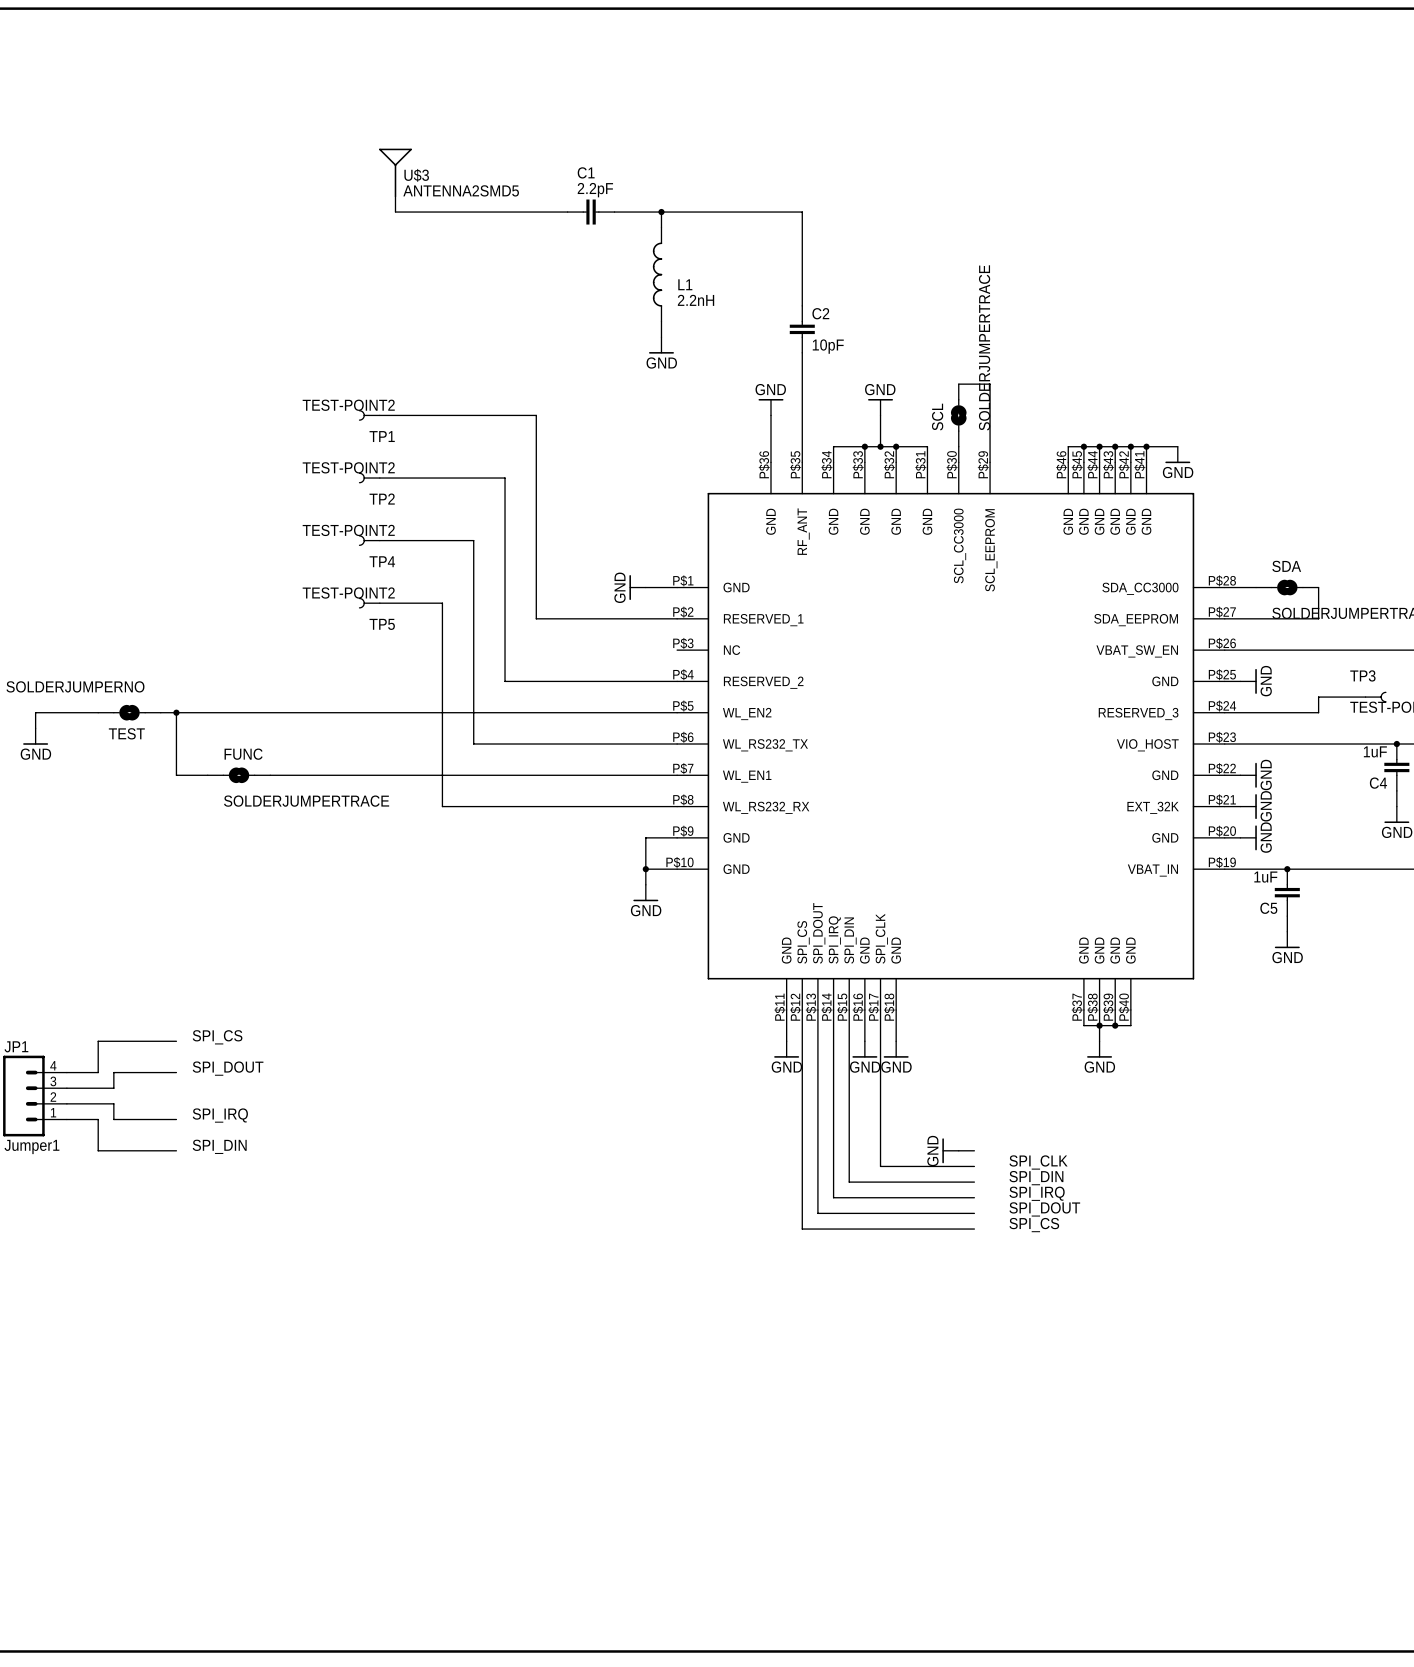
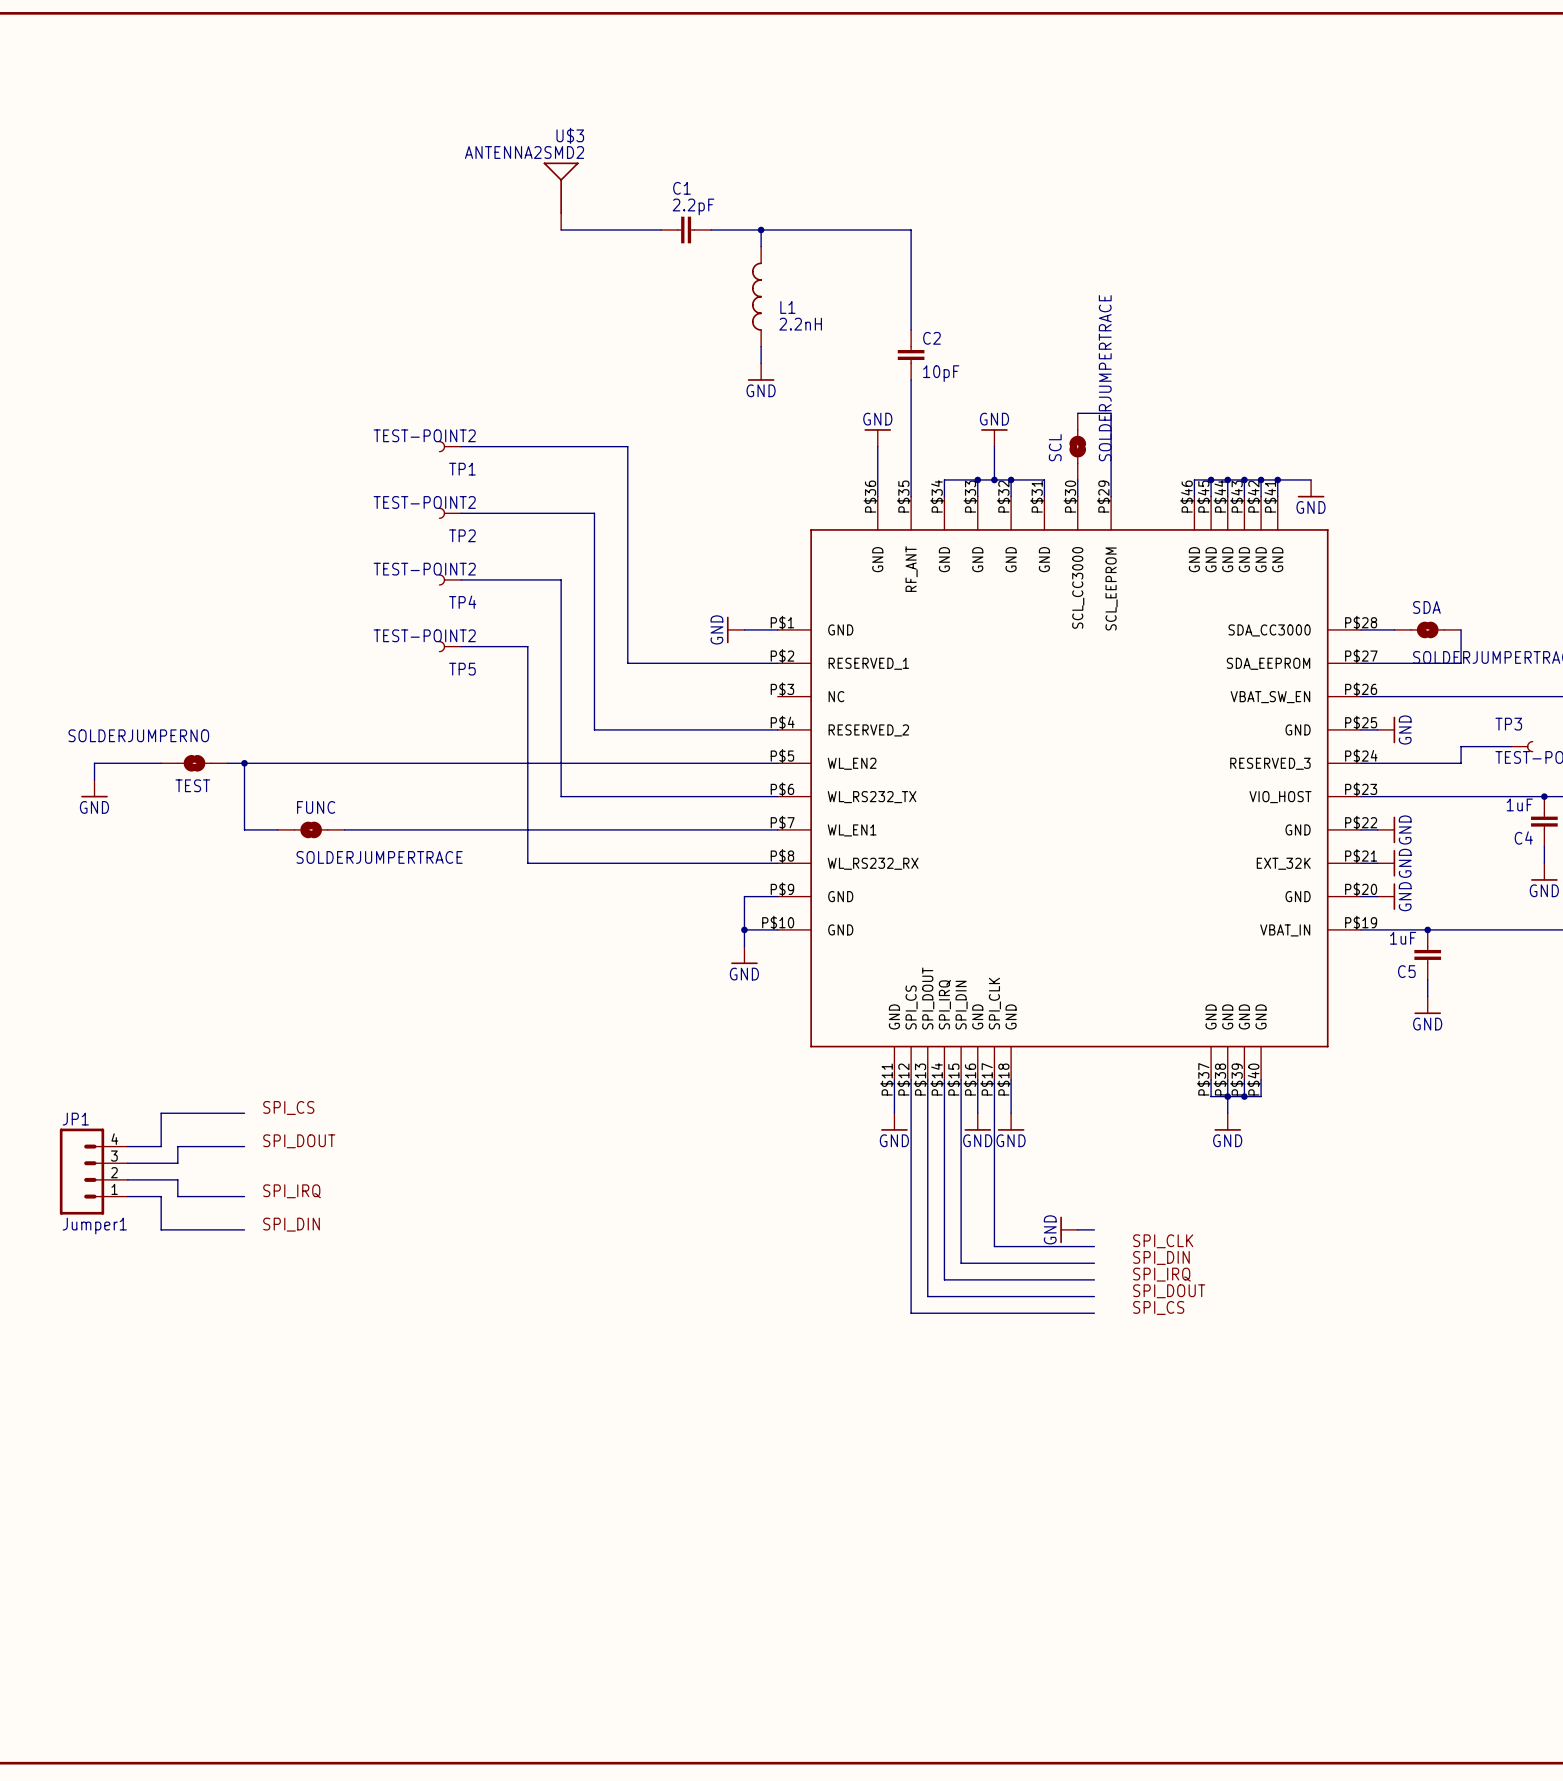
U$3 name position: U$3 (416, 175) -> U$3 (570, 135)
U$3 position: (395, 180) -> (561, 196)
U$3 value: ANTENNA2SMD5 (461, 190) -> ANTENNA2SMD2 (524, 152)
wire: (395, 212) (473, 212) -> none

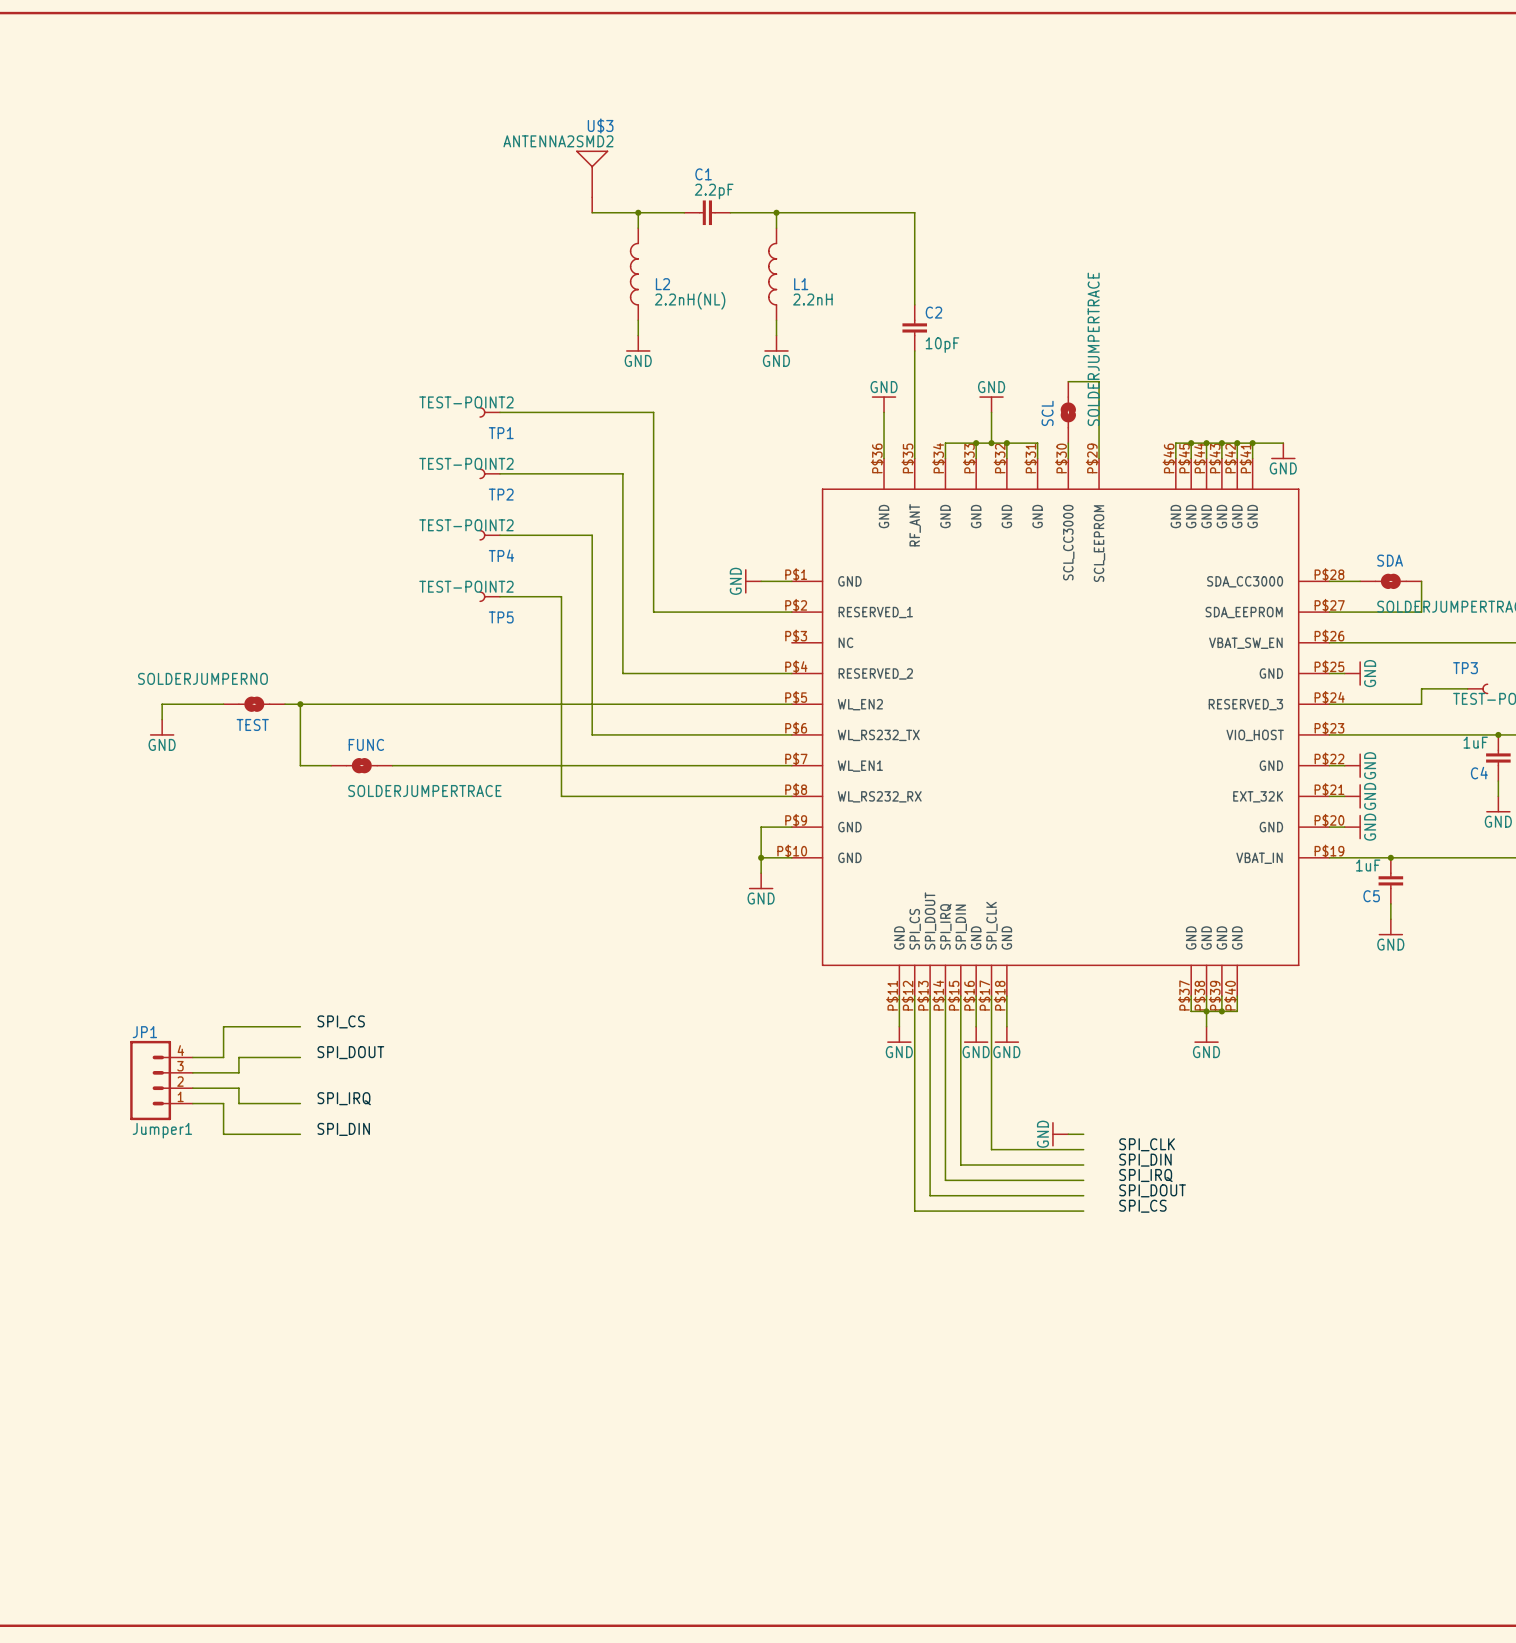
wire: none -> (638, 212) (638, 228)
junction: none -> (638, 212)
L2: none -> 2.2nH(NL) (634, 274)
wire: none -> (638, 320) (638, 335)
power symbol: none -> GND (638, 343)

